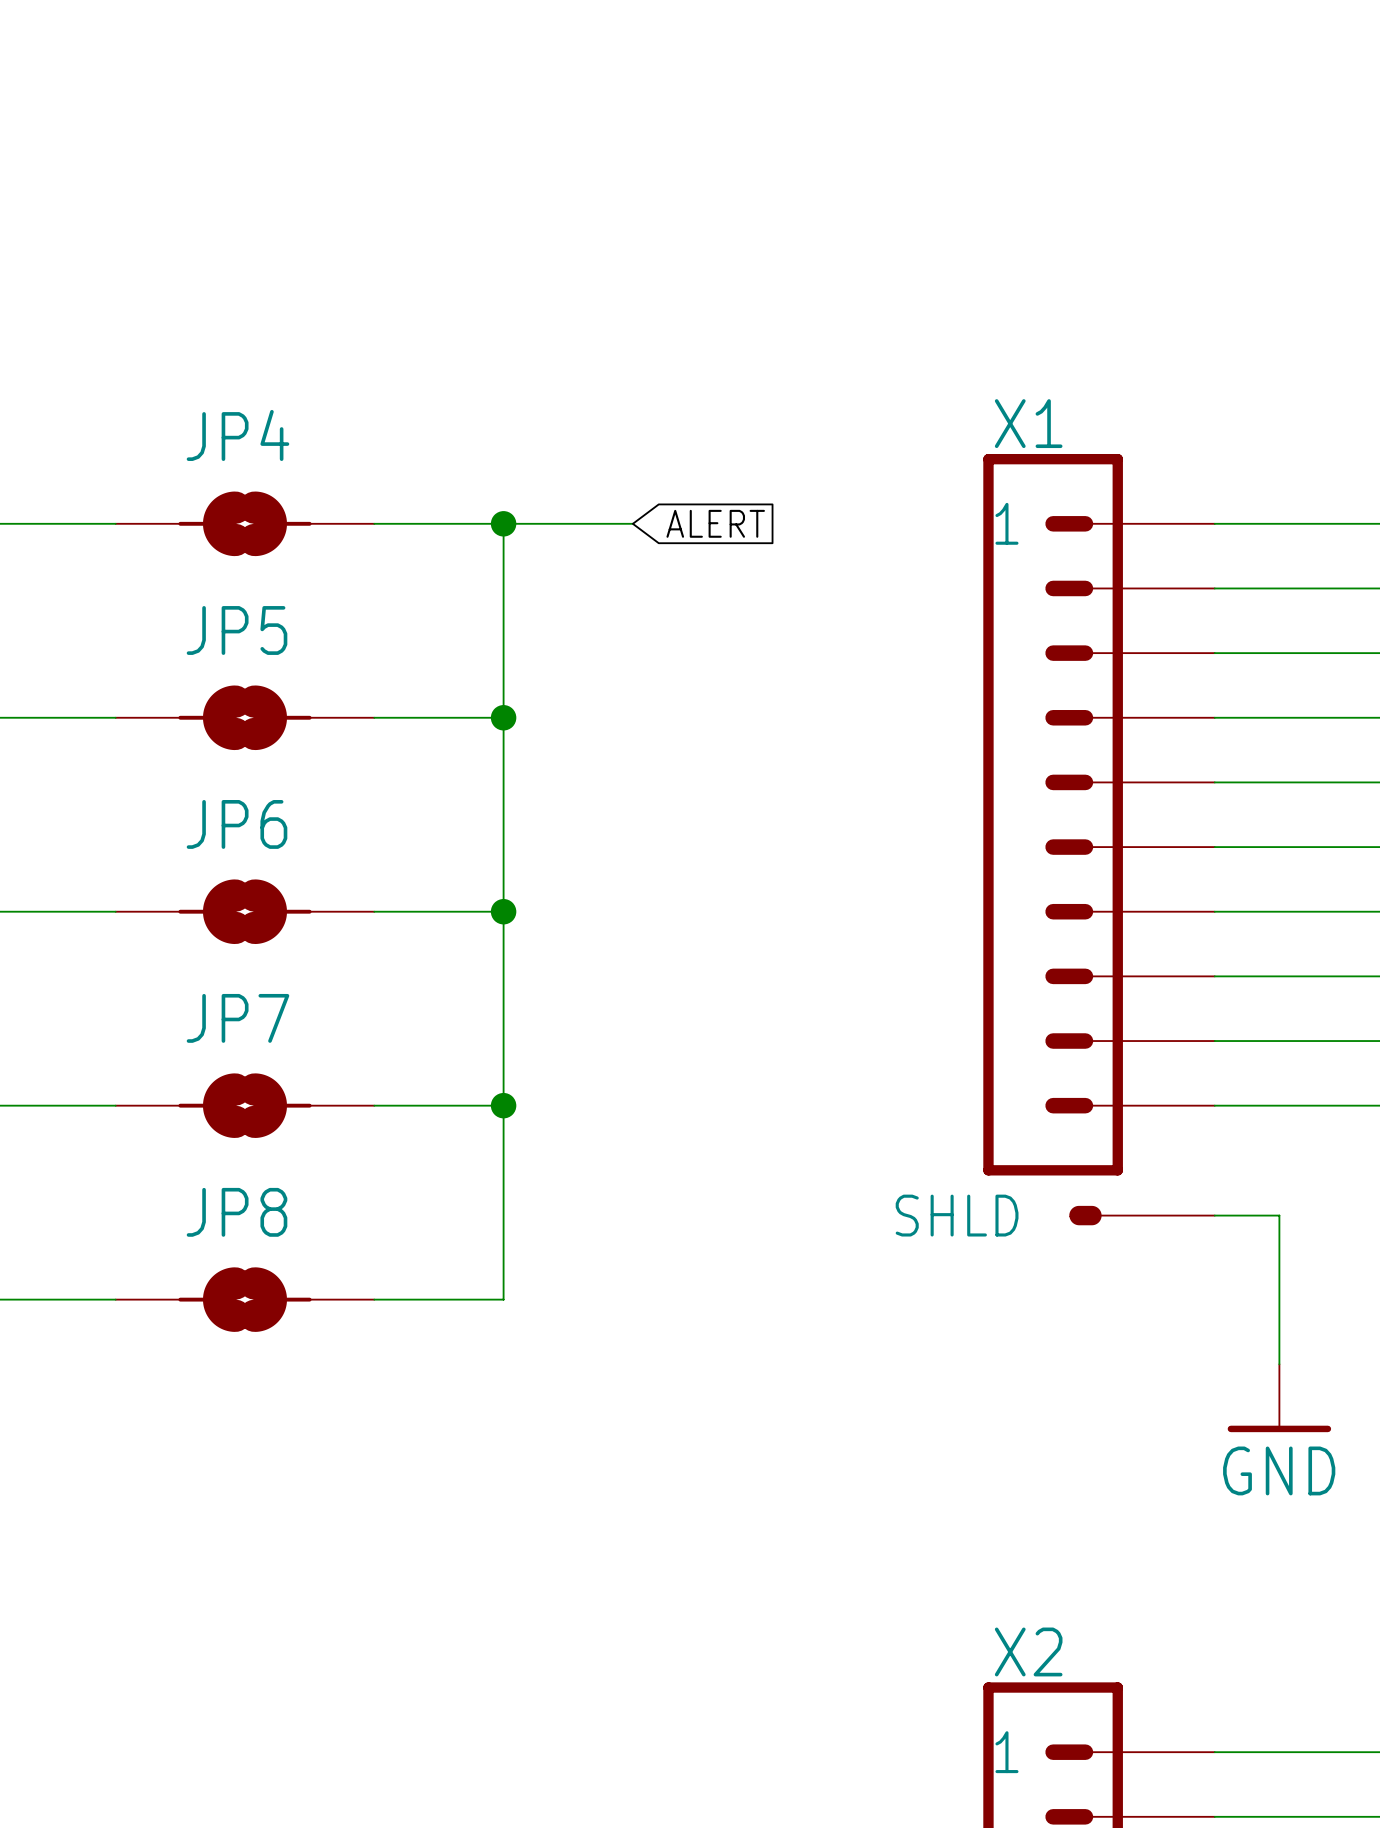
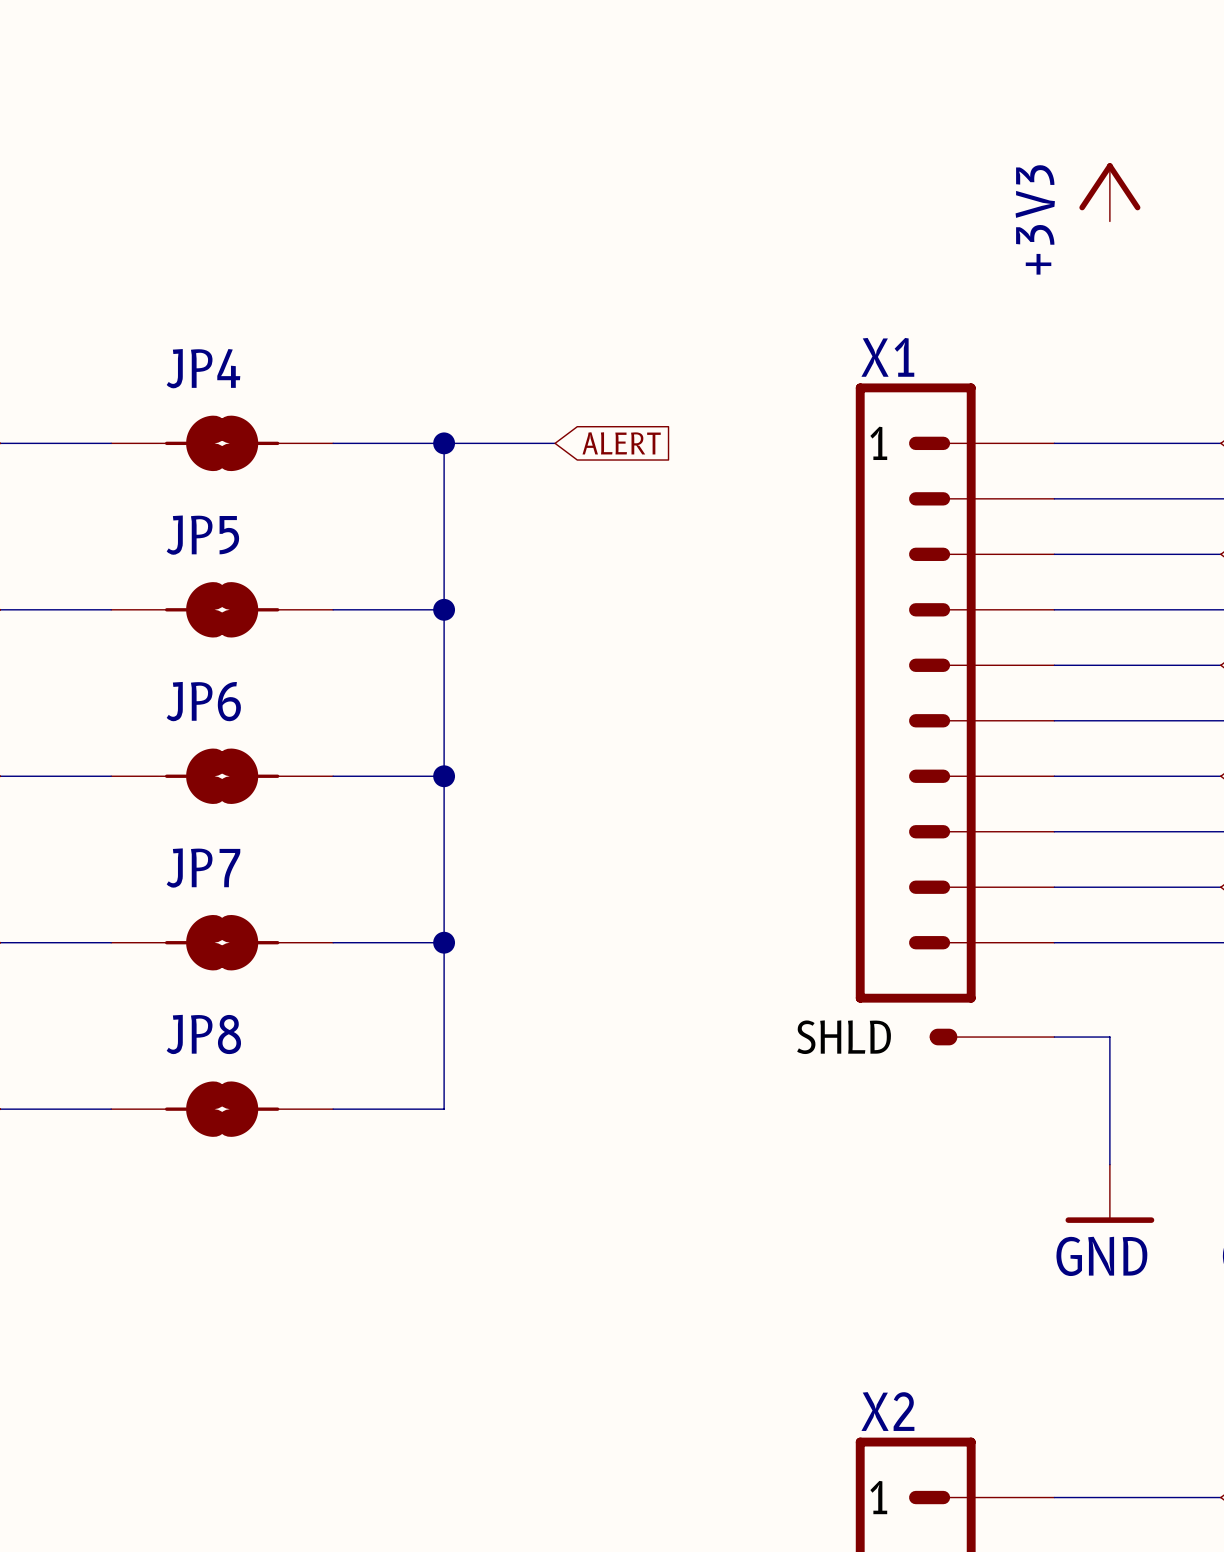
power symbol: none -> +3V3 (1109, 192)

